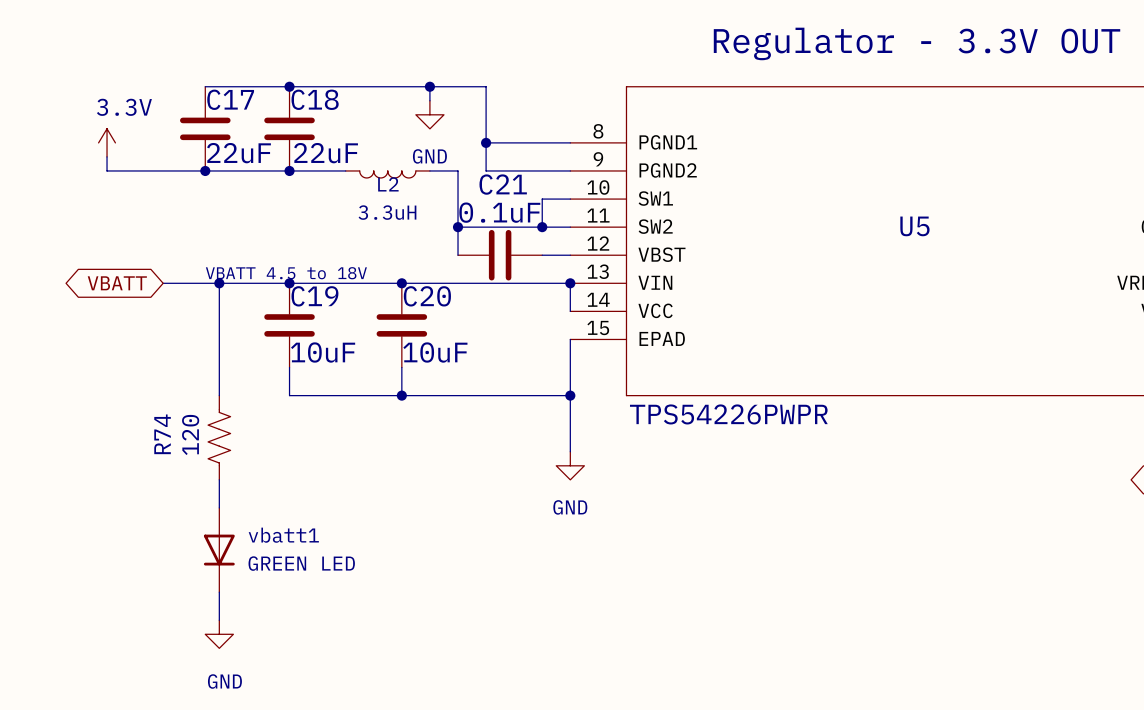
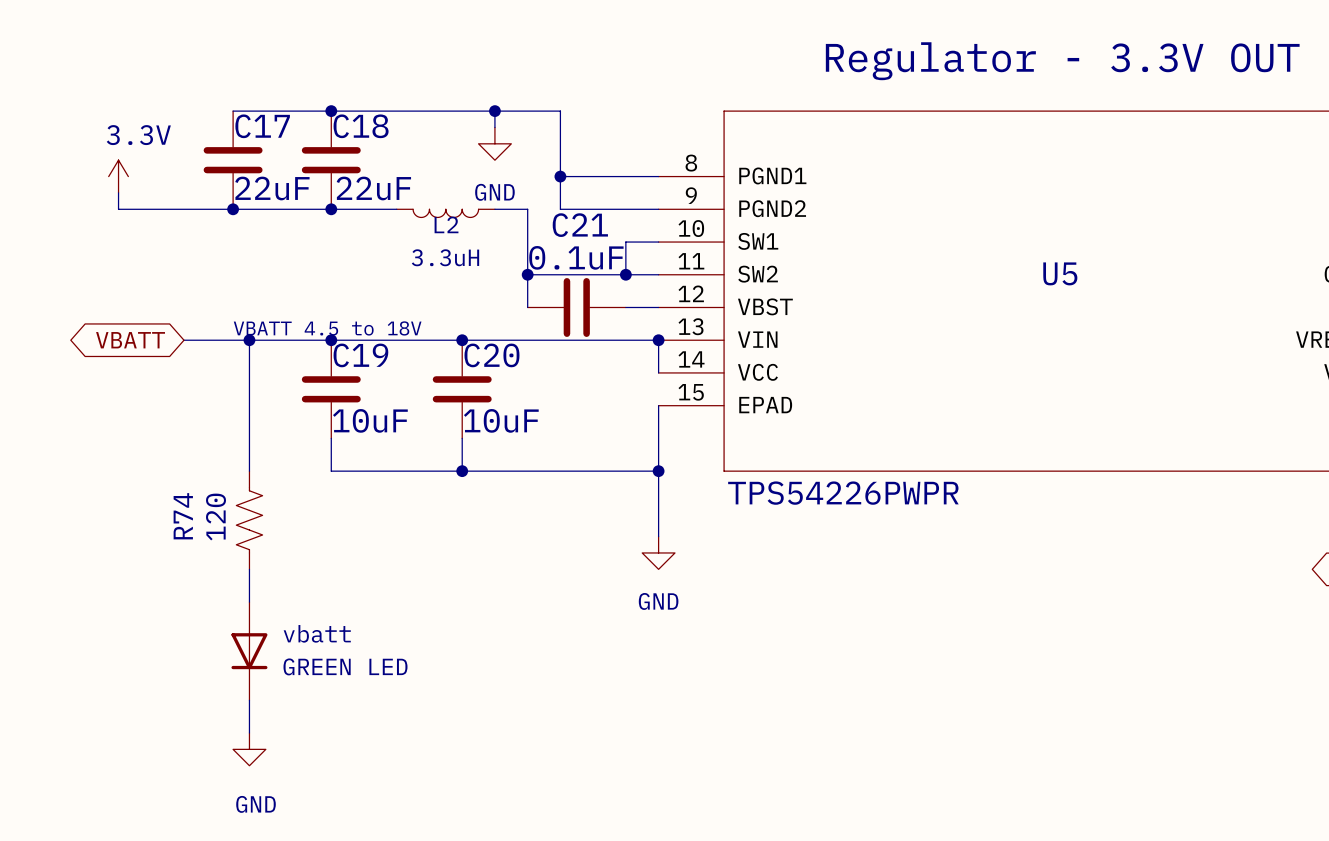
vbatt1 name: vbatt1 (283, 535) -> vbatt (317, 633)

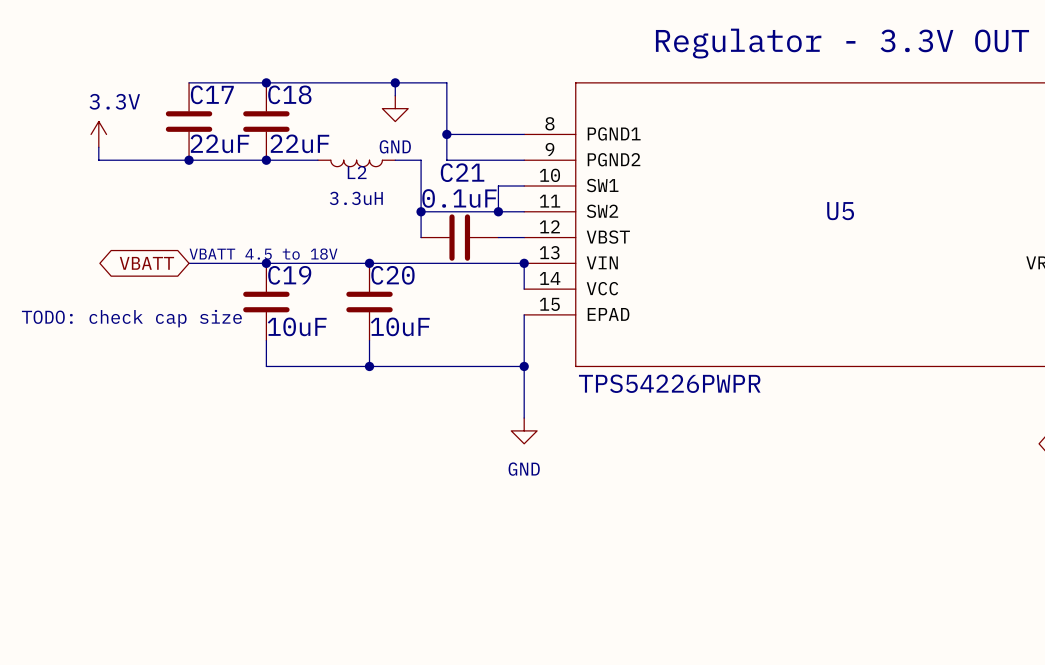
global label position: VBATT (130, 340) -> VBATT (146, 263)
wire: (184, 340) (233, 340) -> none
wire: (249, 340) (249, 471) -> none
junction: (249, 340) -> none
text: none -> TODO: check cap size (131, 318)
R74: 120 (249, 520) -> none
wire: (249, 569) (249, 602) -> none
vbatt: GREEN LED (249, 651) -> none
wire: (249, 700) (249, 733) -> none
power symbol: GND (249, 749) -> none

